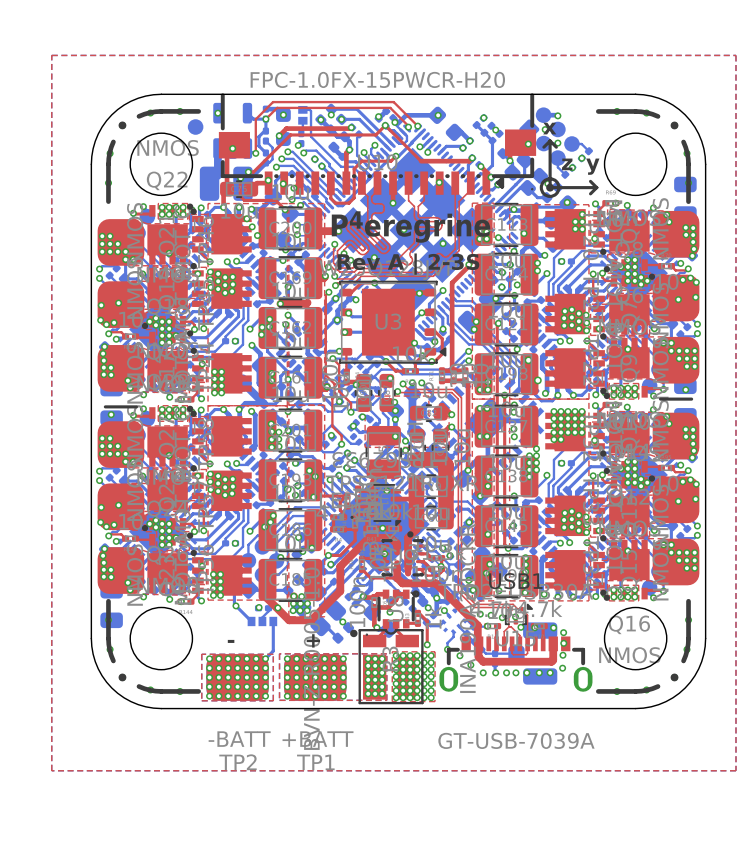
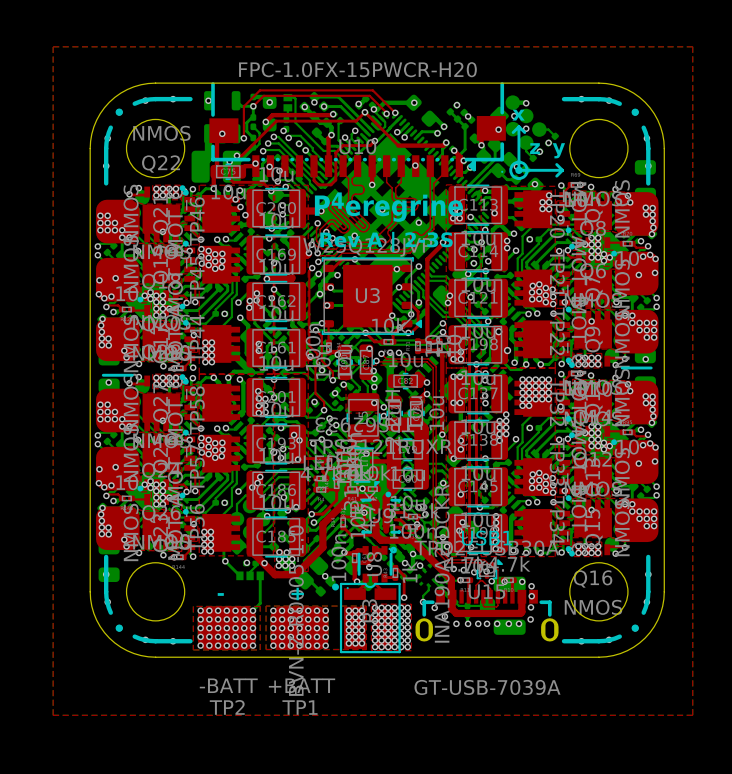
part: (195, 127) -> none

